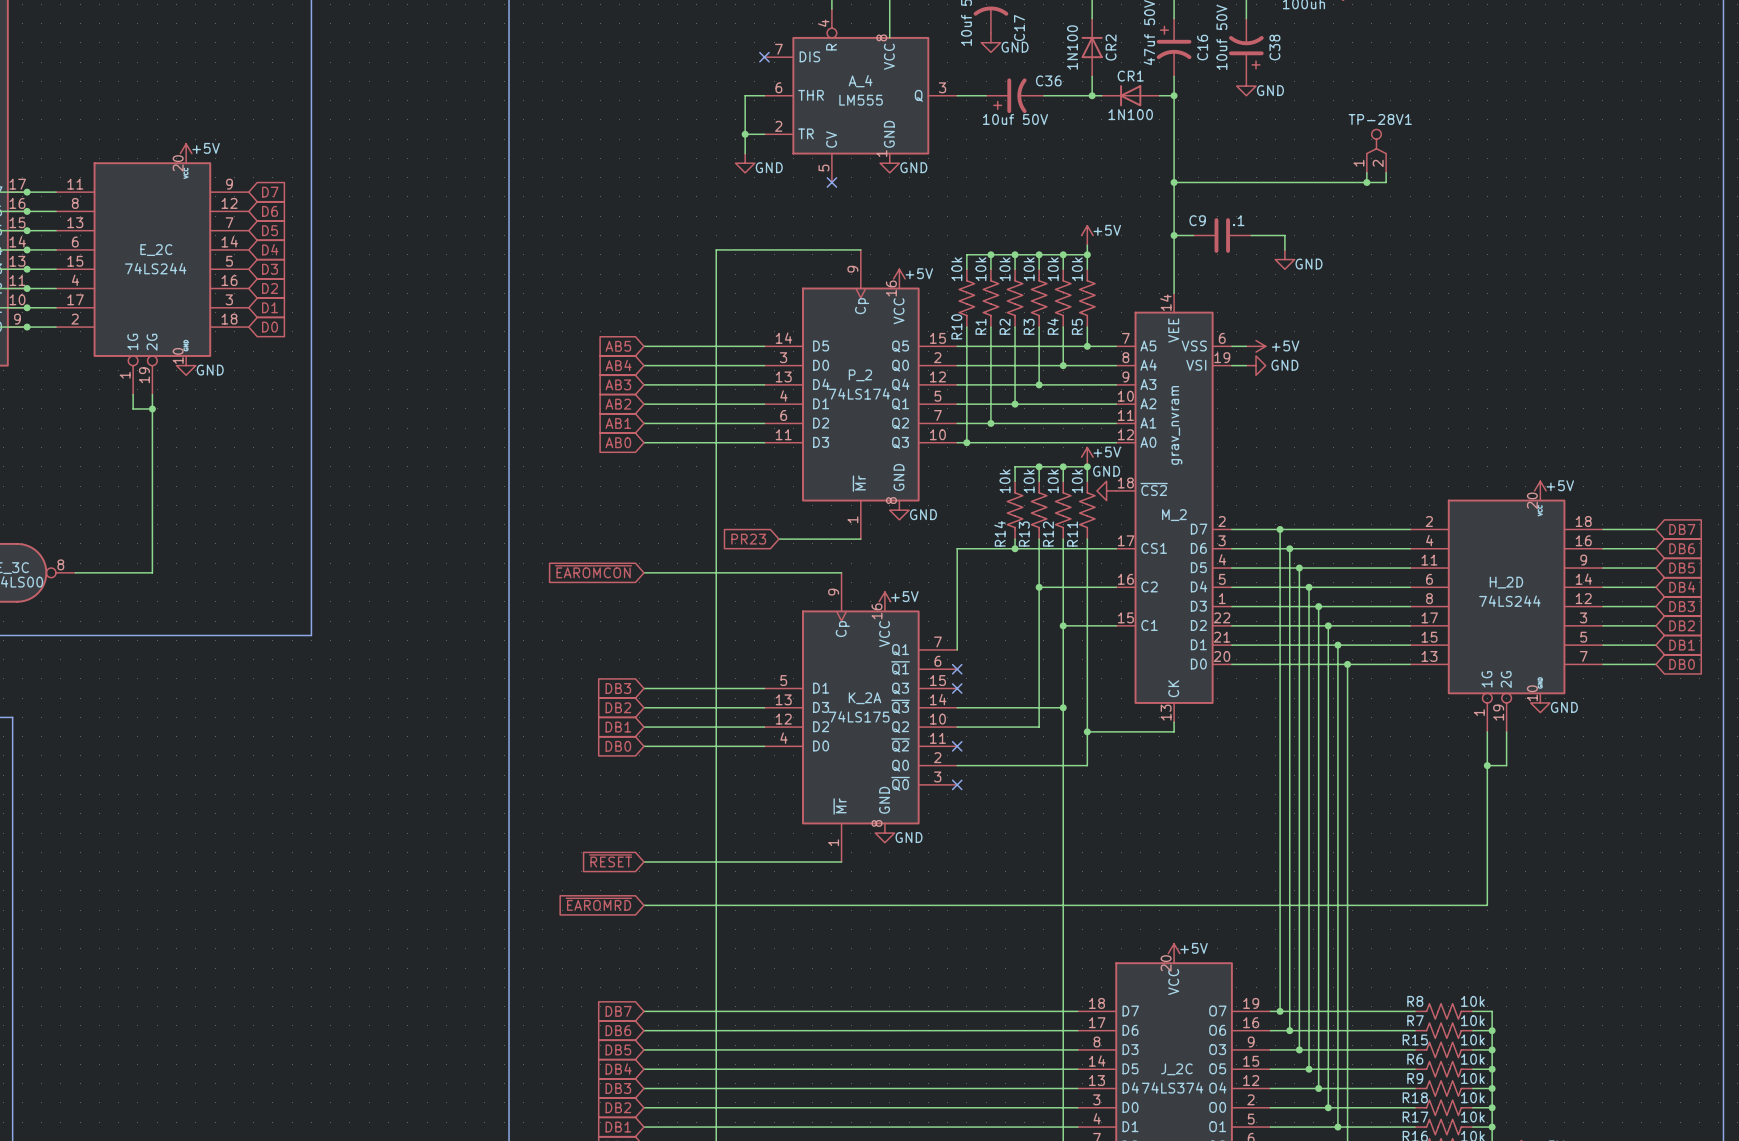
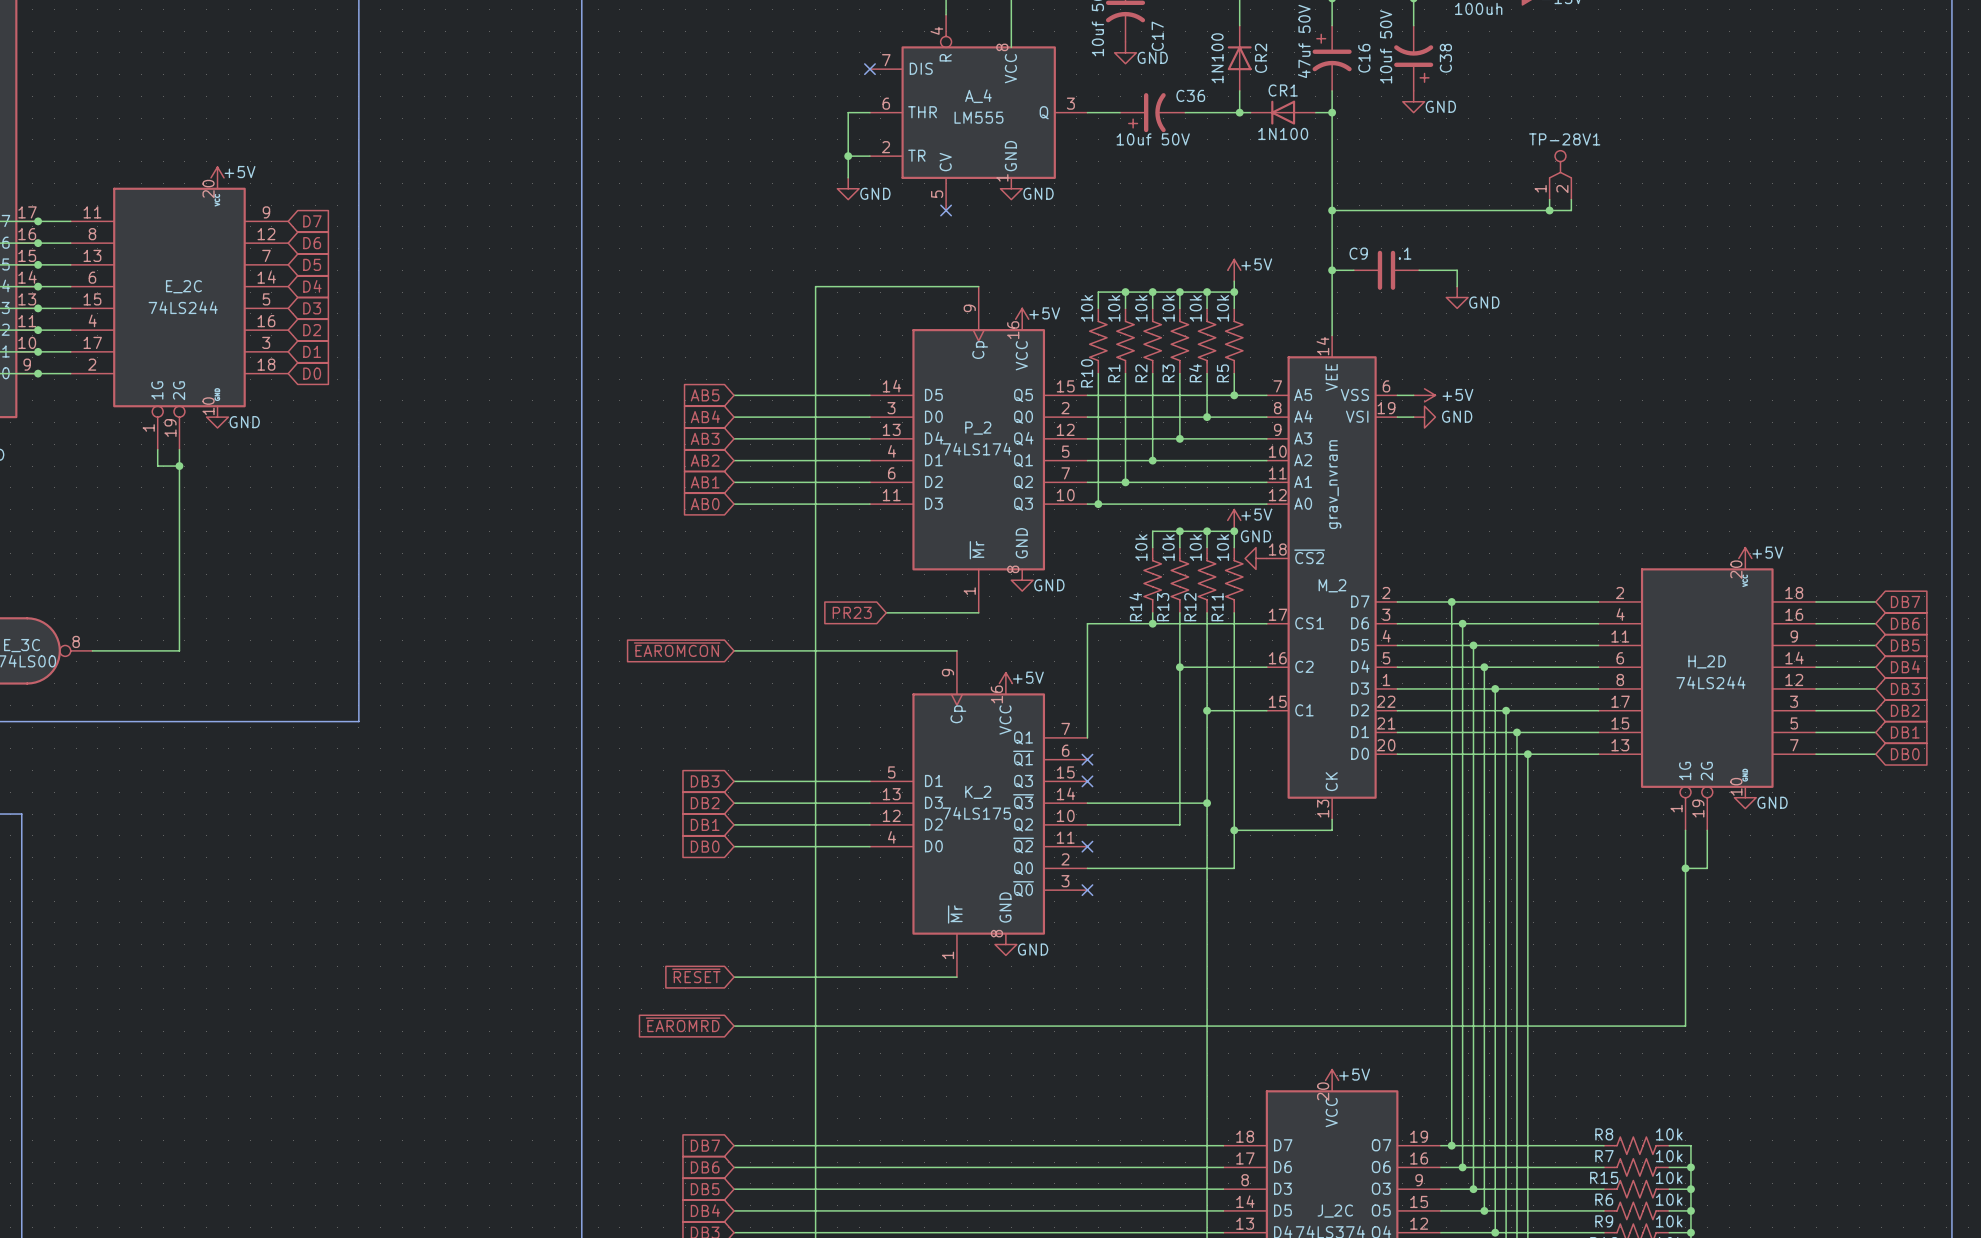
K_2A name: K_2A (865, 698) -> K_2 (978, 792)

